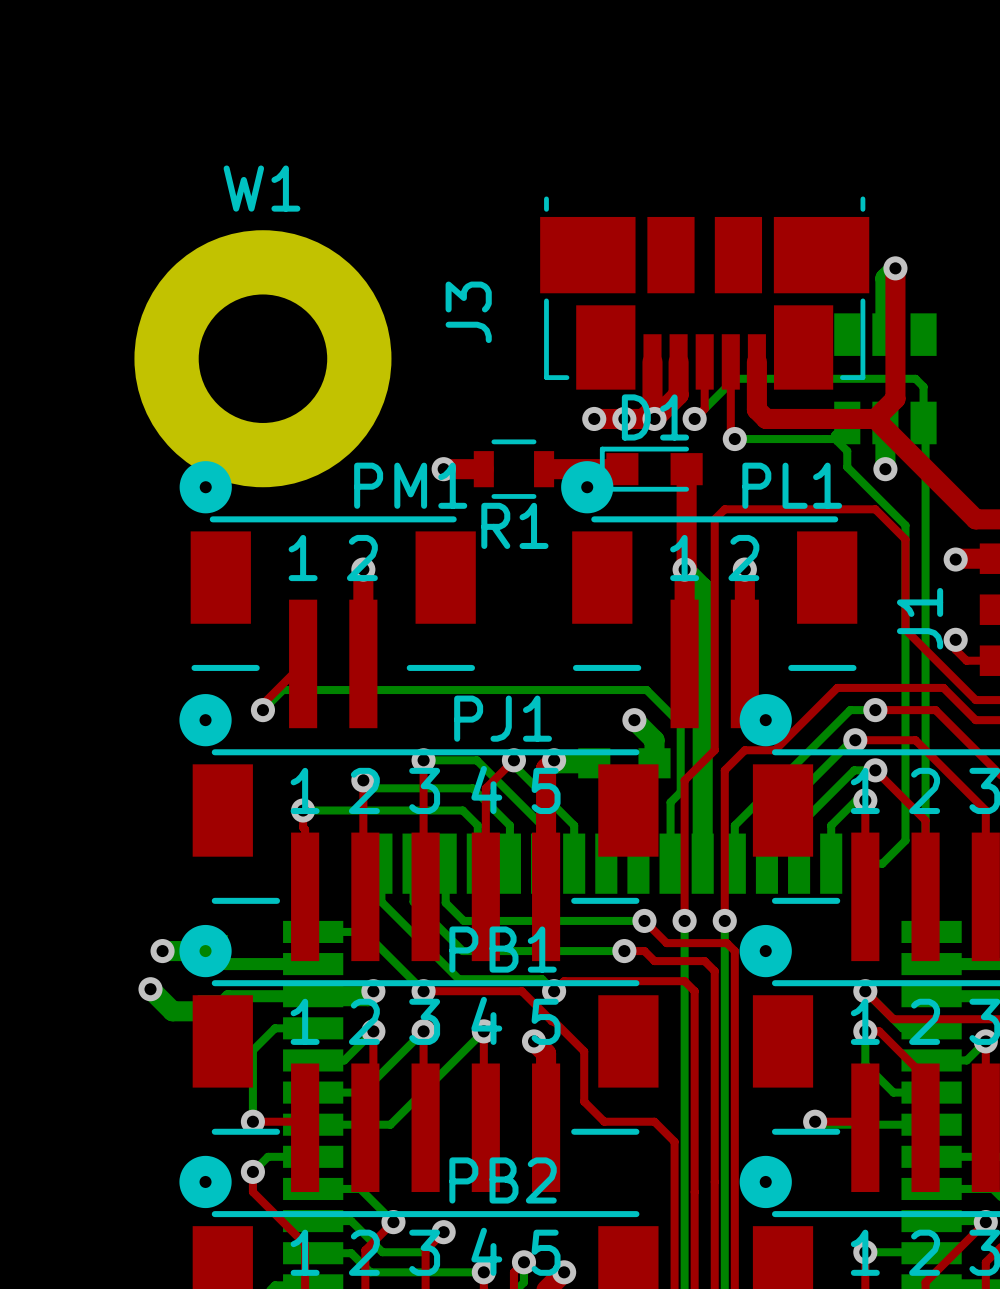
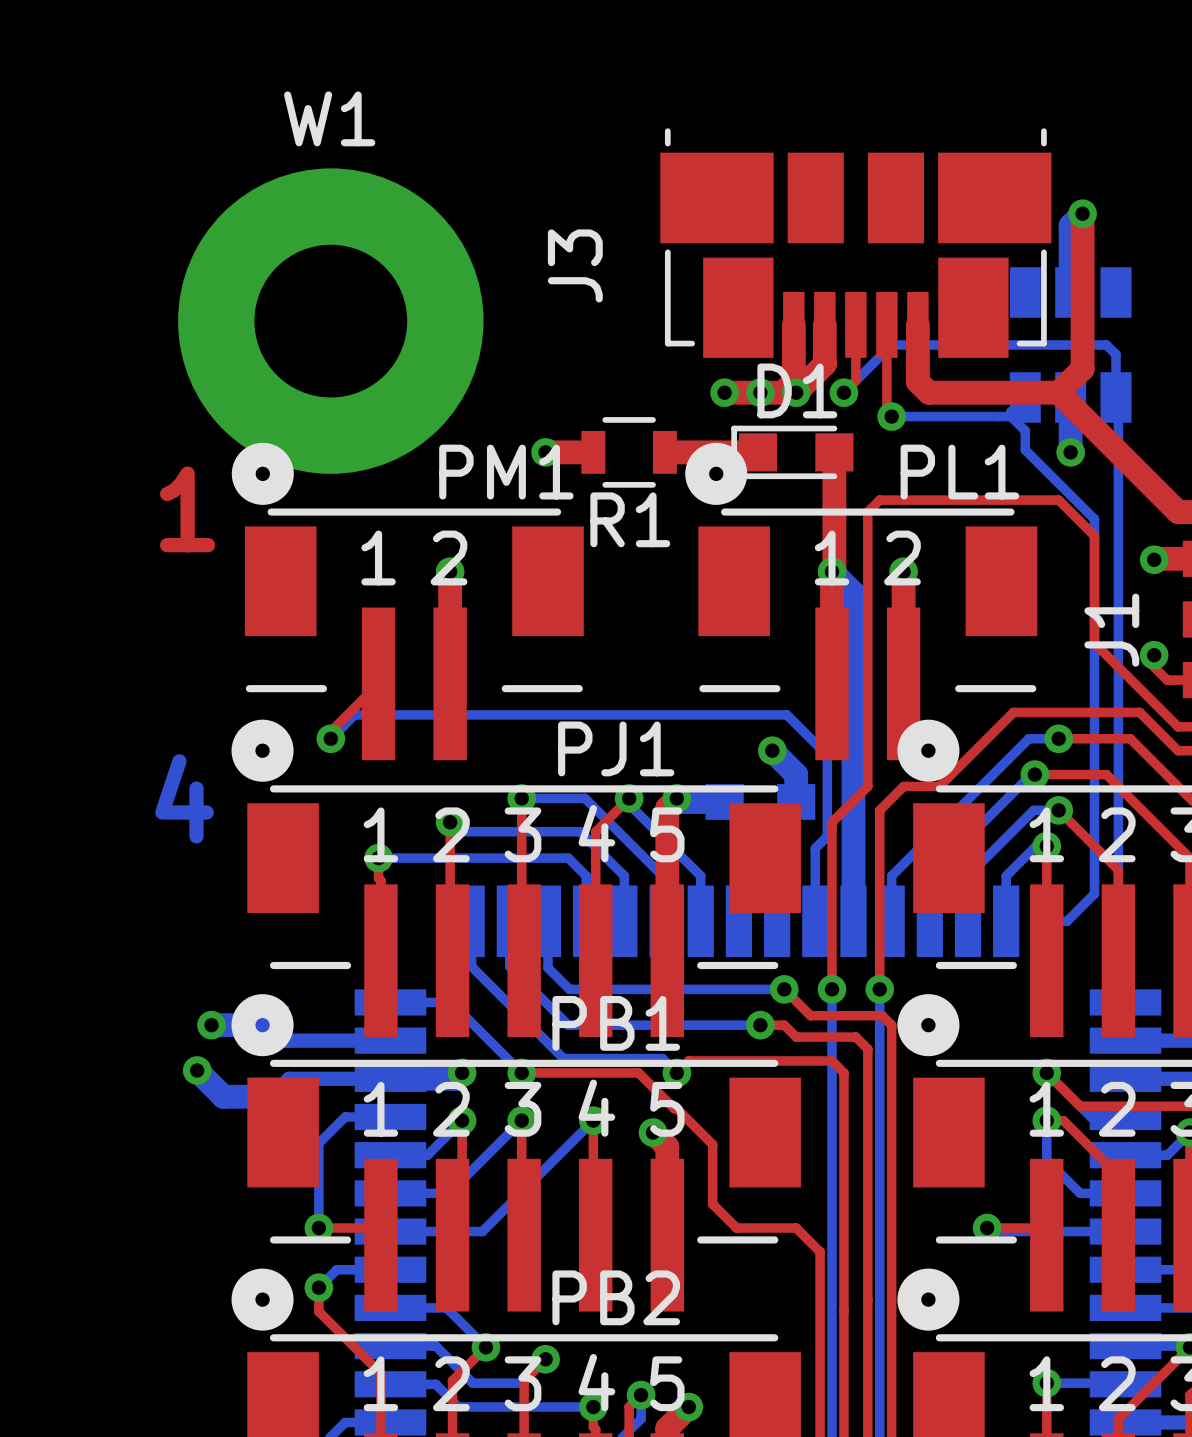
text: none -> 1 (187, 509)
text: none -> 4 (184, 798)

